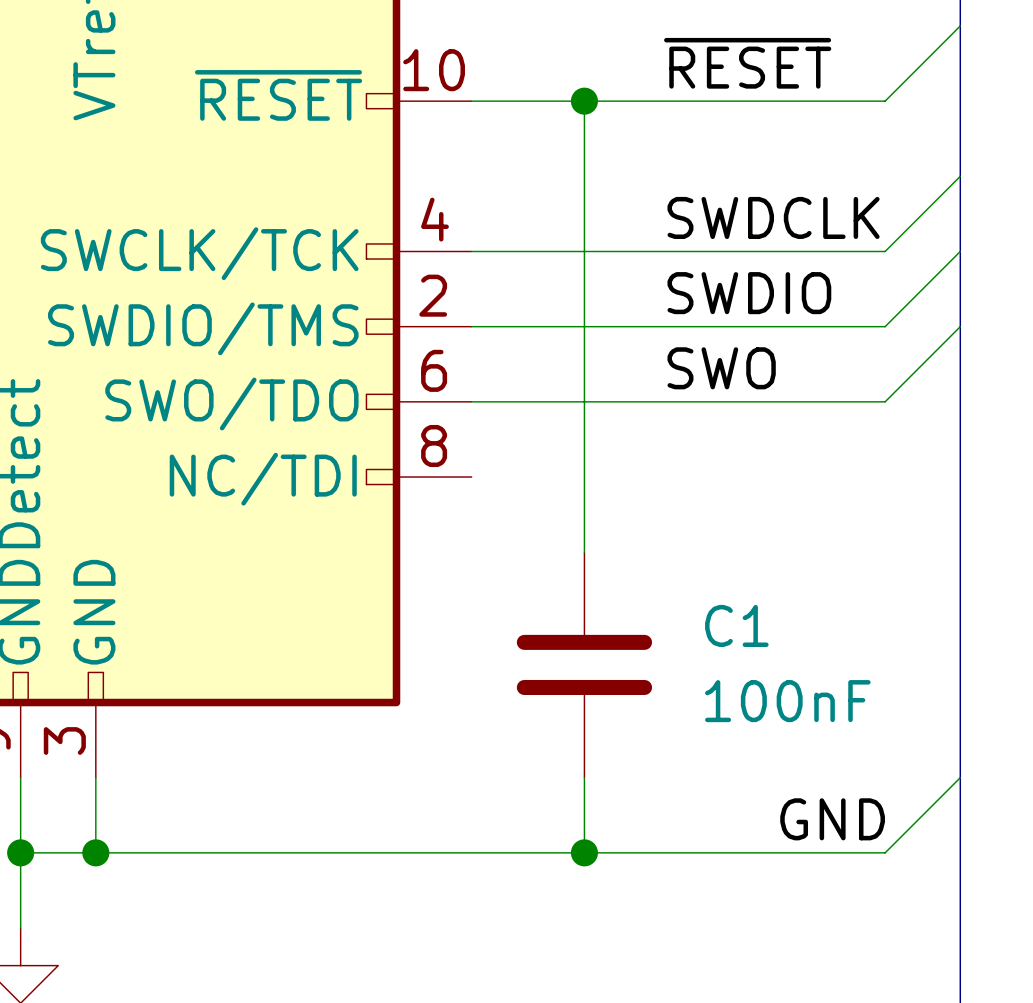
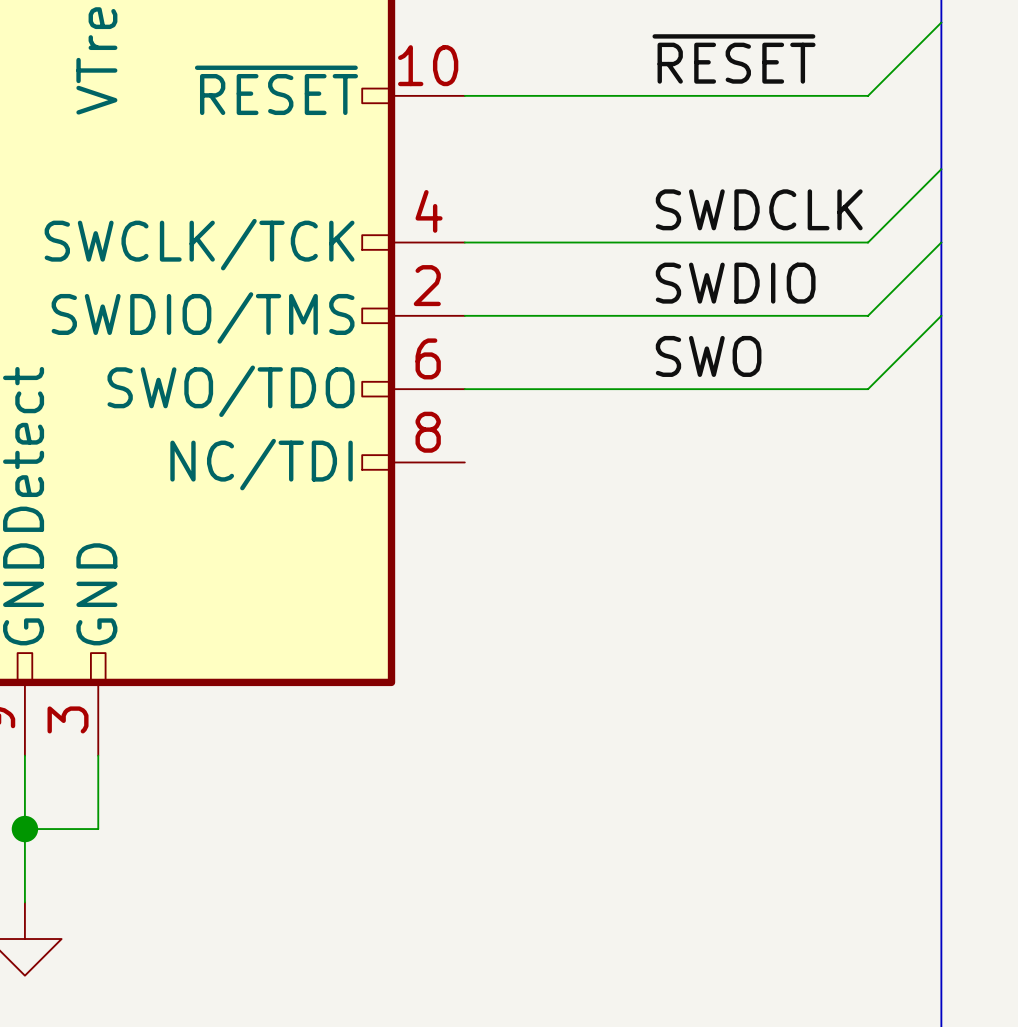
wire: (584, 101) (584, 552) -> none
junction: (584, 101) -> none
C1: 100nF (584, 664) -> none
wire: (584, 777) (584, 852) -> none
wire: (960, 777) (885, 852) (95, 852) -> none
label: GND (832, 819) -> none
junction: (95, 852) -> none
junction: (584, 852) -> none

